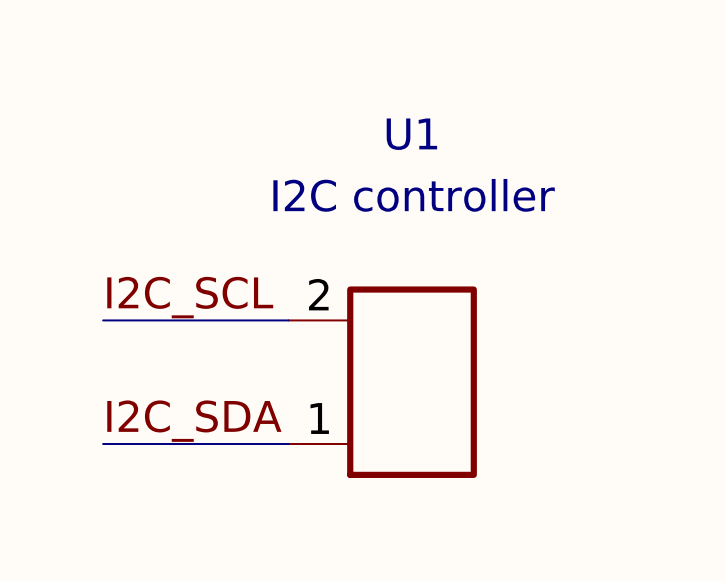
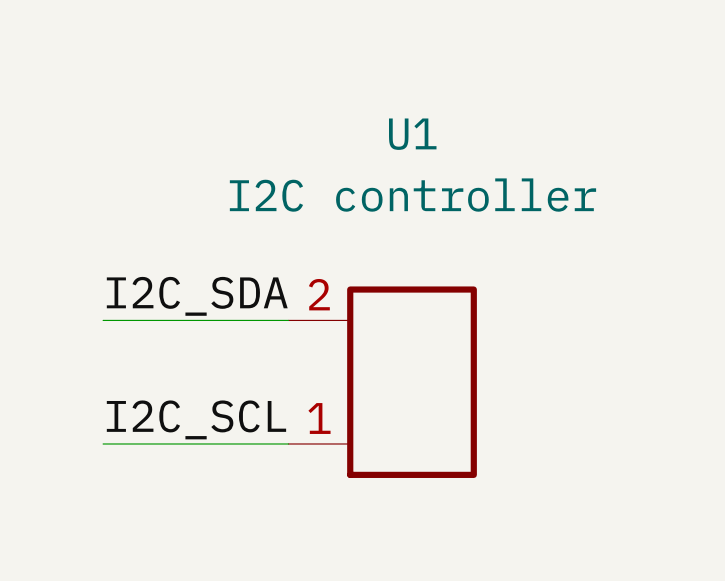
label: I2C_SCL (190, 297) -> I2C_SDA (197, 296)
label: I2C_SDA (194, 421) -> I2C_SCL (196, 419)

